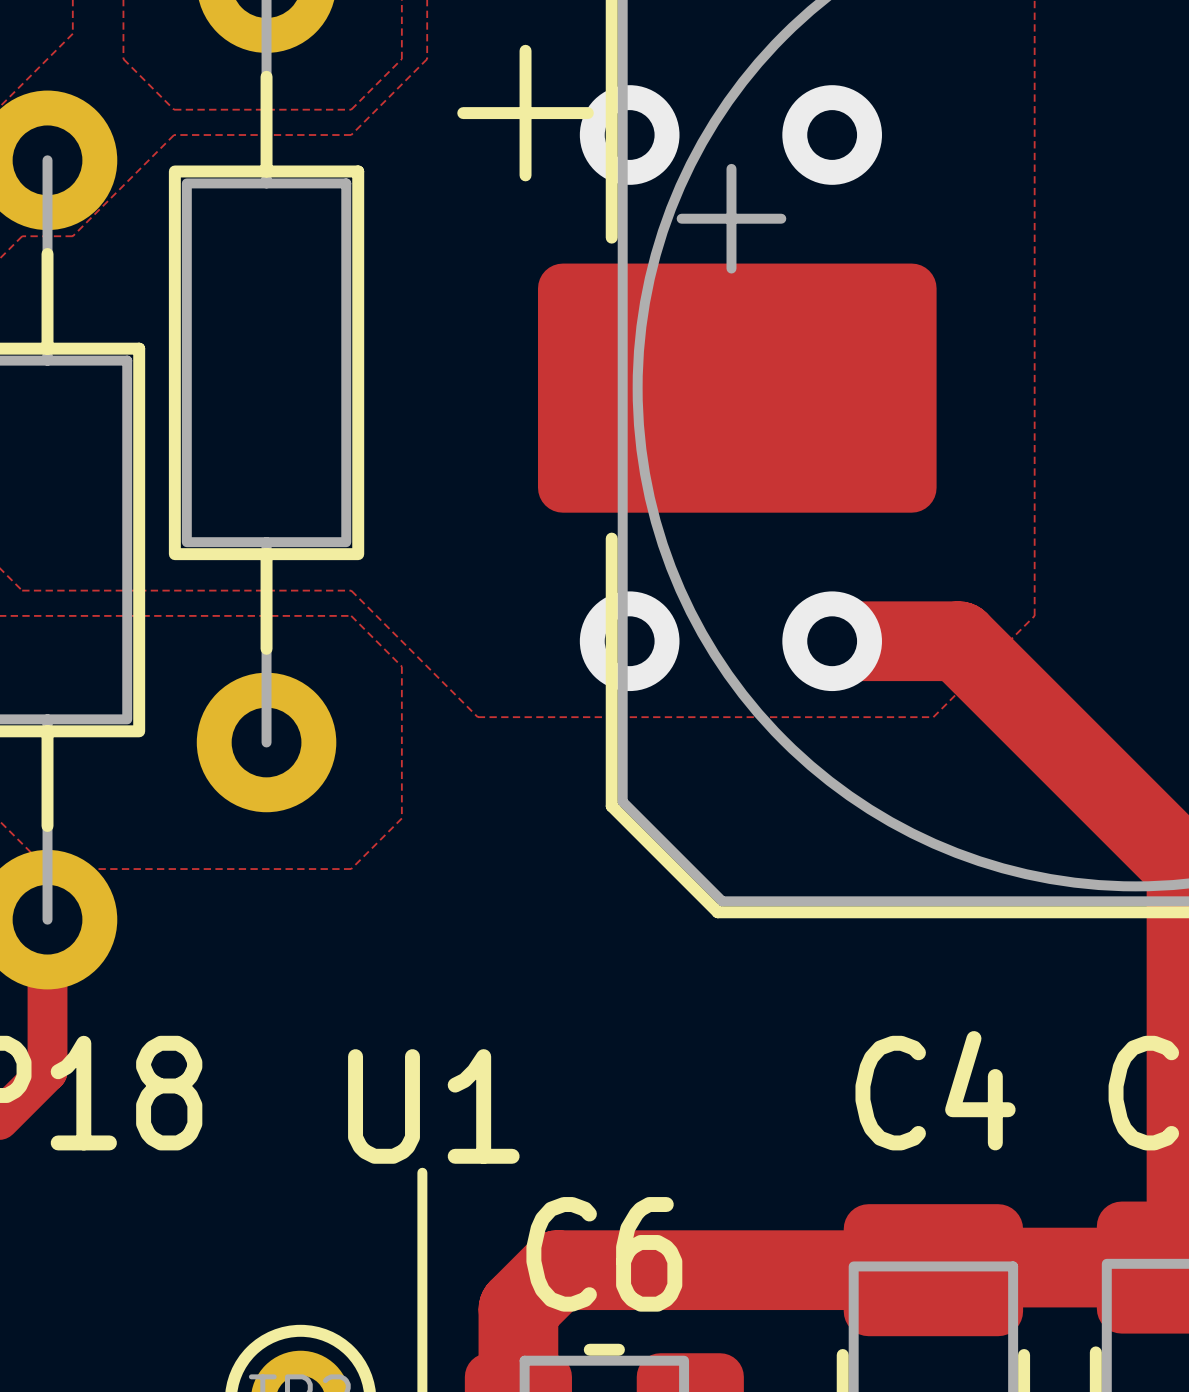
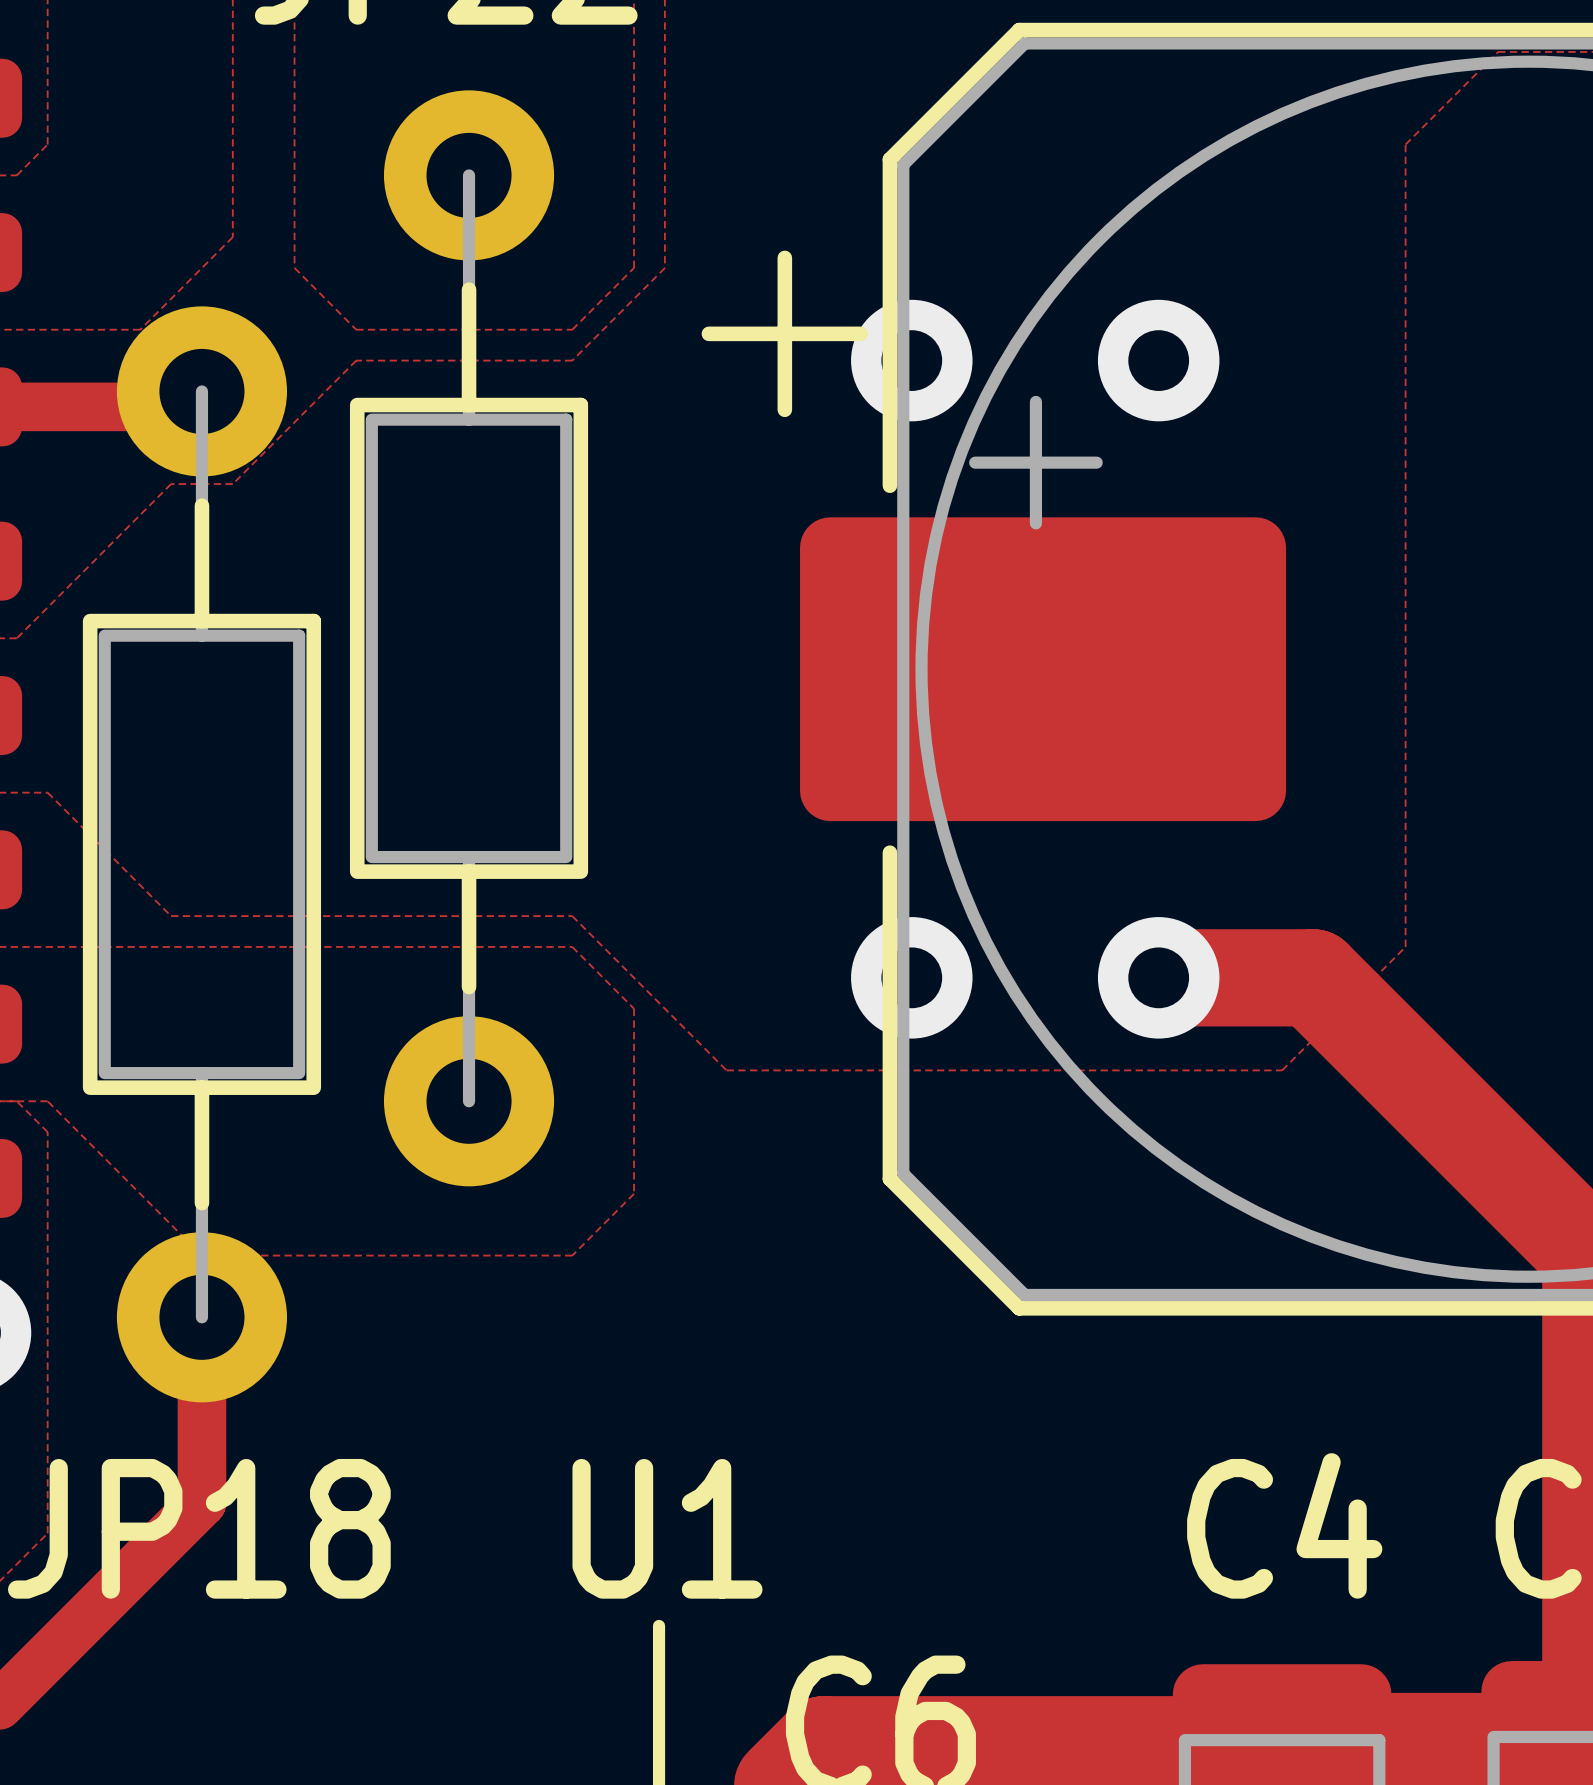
U1 name position: U1 (433, 1106) -> U1 (667, 1528)

